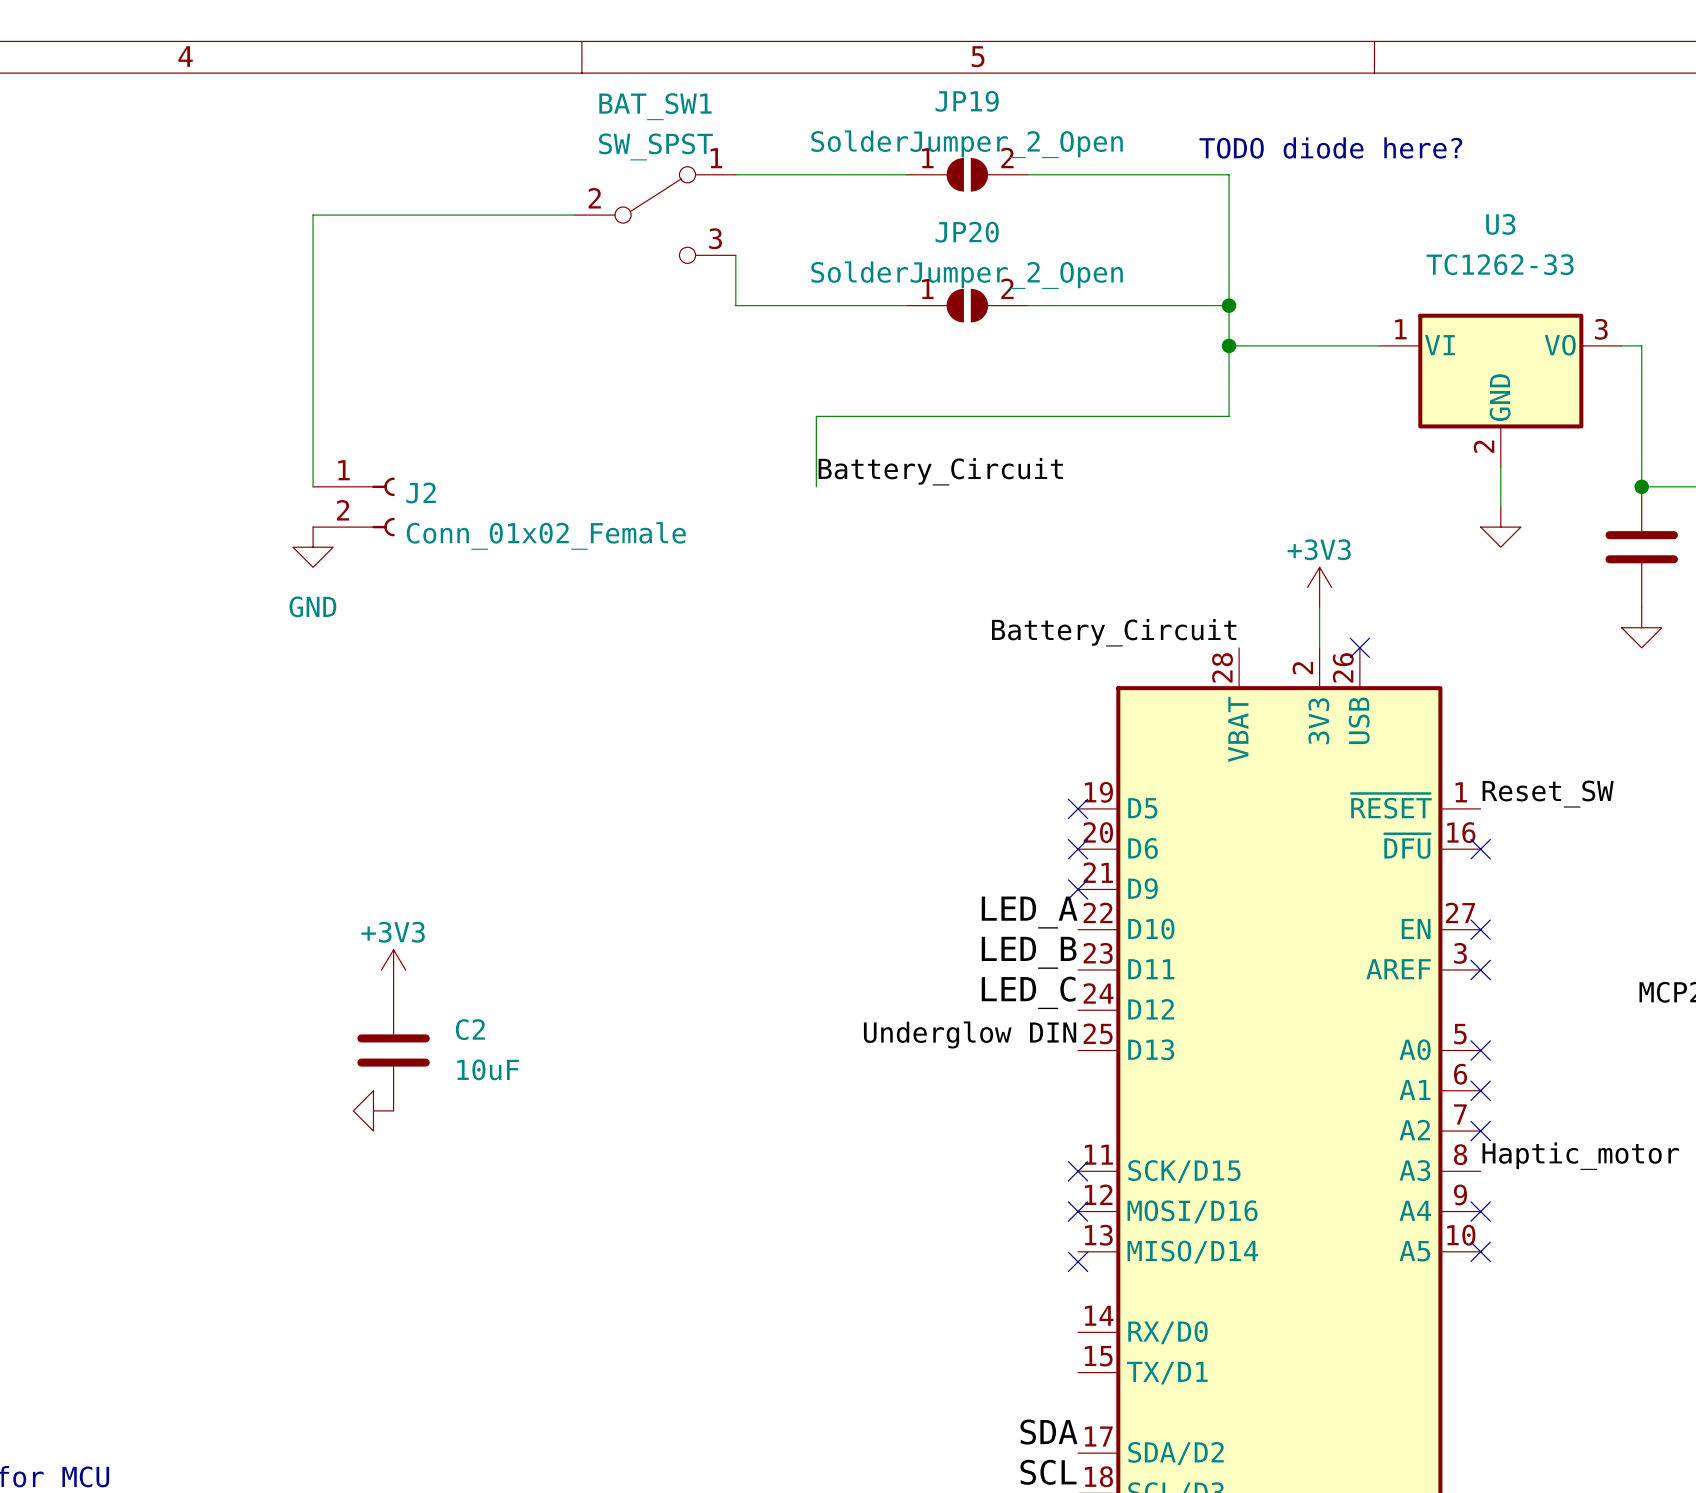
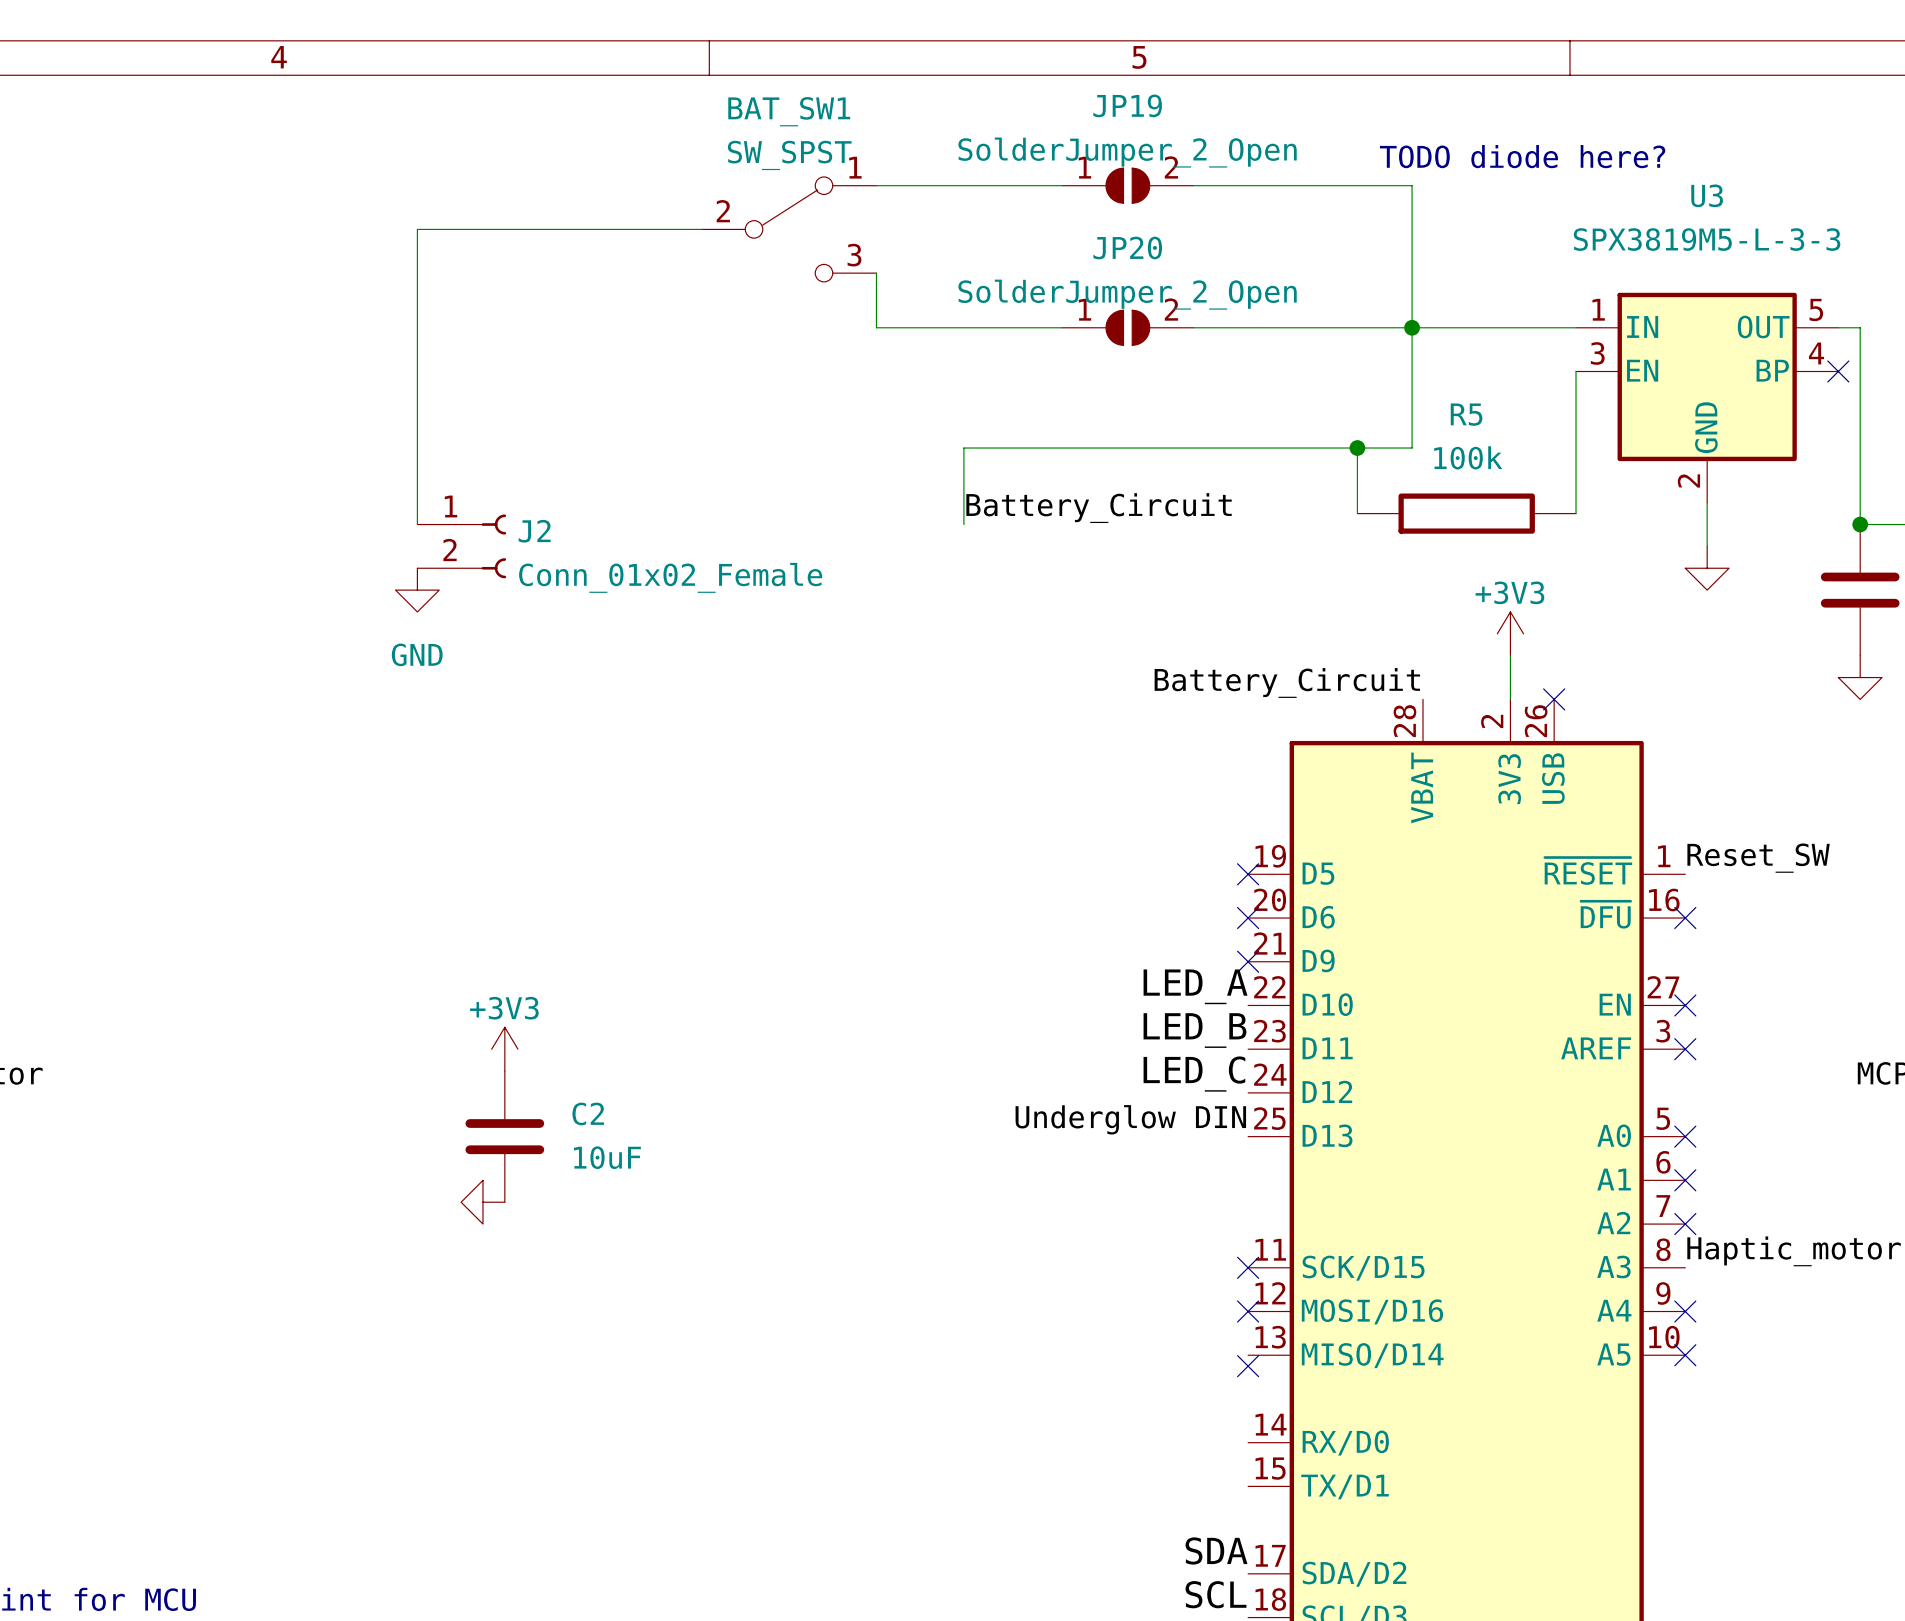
U3 value: TC1262-33 (1500, 264) -> SPX3819M5-L-3-3 (1707, 239)
wire: none -> (1412, 327) (1576, 327)
U3 symbol: [1380, 313, 1622, 467] -> [1576, 292, 1839, 503]
wire: (1229, 345) (1380, 345) -> (1576, 513) (1576, 371)
junction position: (1229, 345) -> (1357, 448)
wire: (1621, 345) (1641, 345) -> (1838, 327) (1860, 327) (1860, 371)
no-connect mark: none -> (1838, 371)
wire: none -> (1357, 448) (1357, 513)
R5: none -> 100k (1466, 513)

